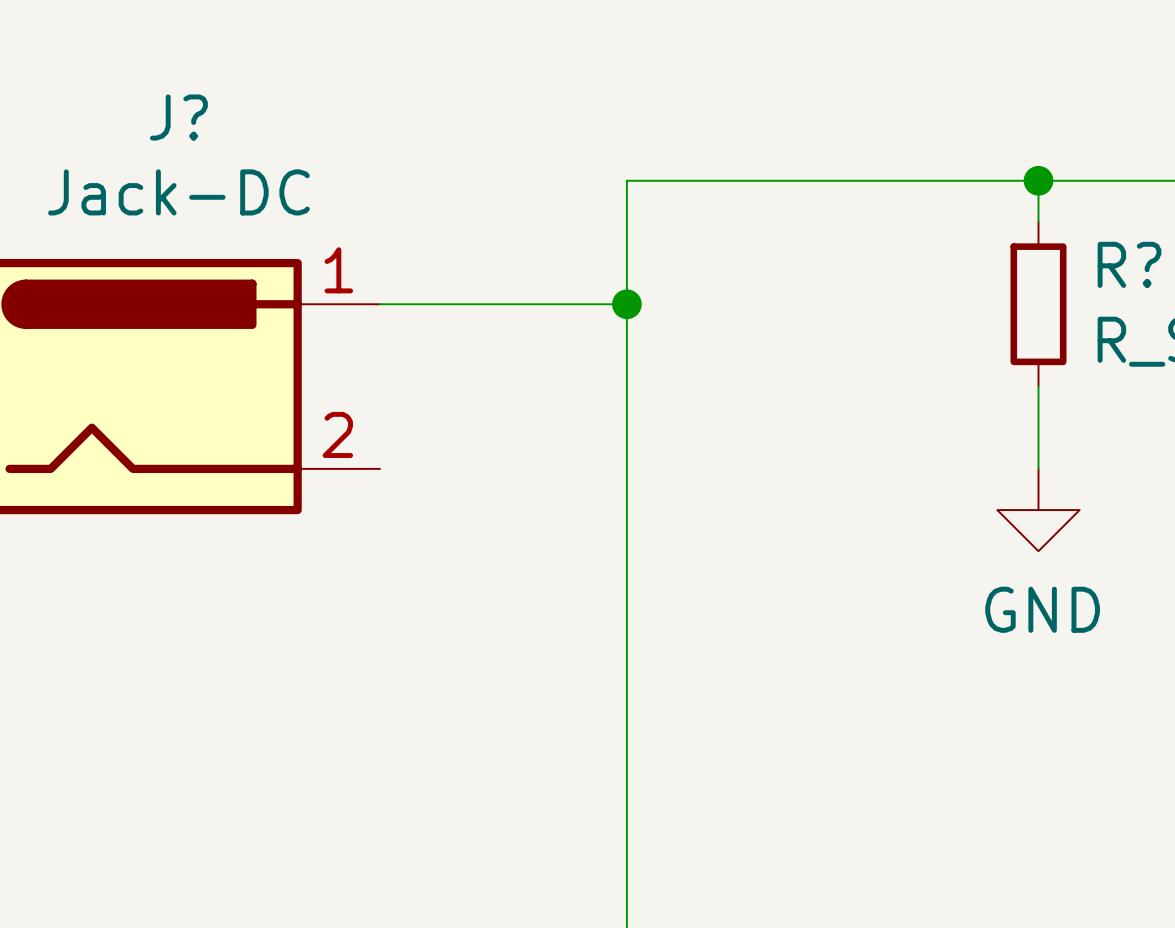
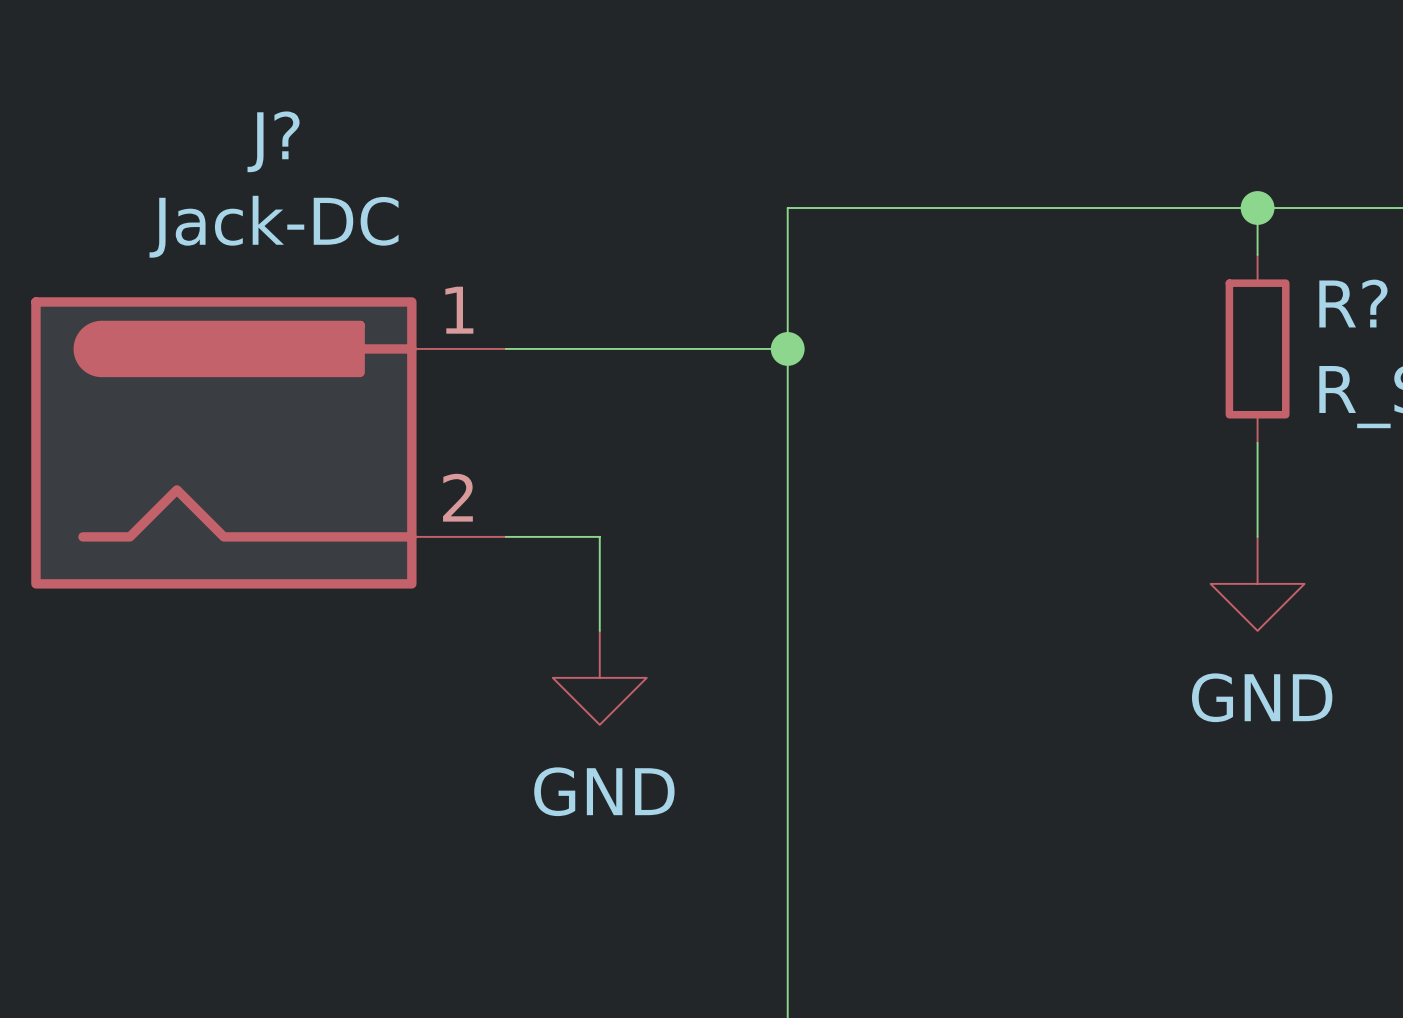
wire: none -> (505, 536) (599, 536) (599, 630)
power symbol: none -> GND (599, 677)

